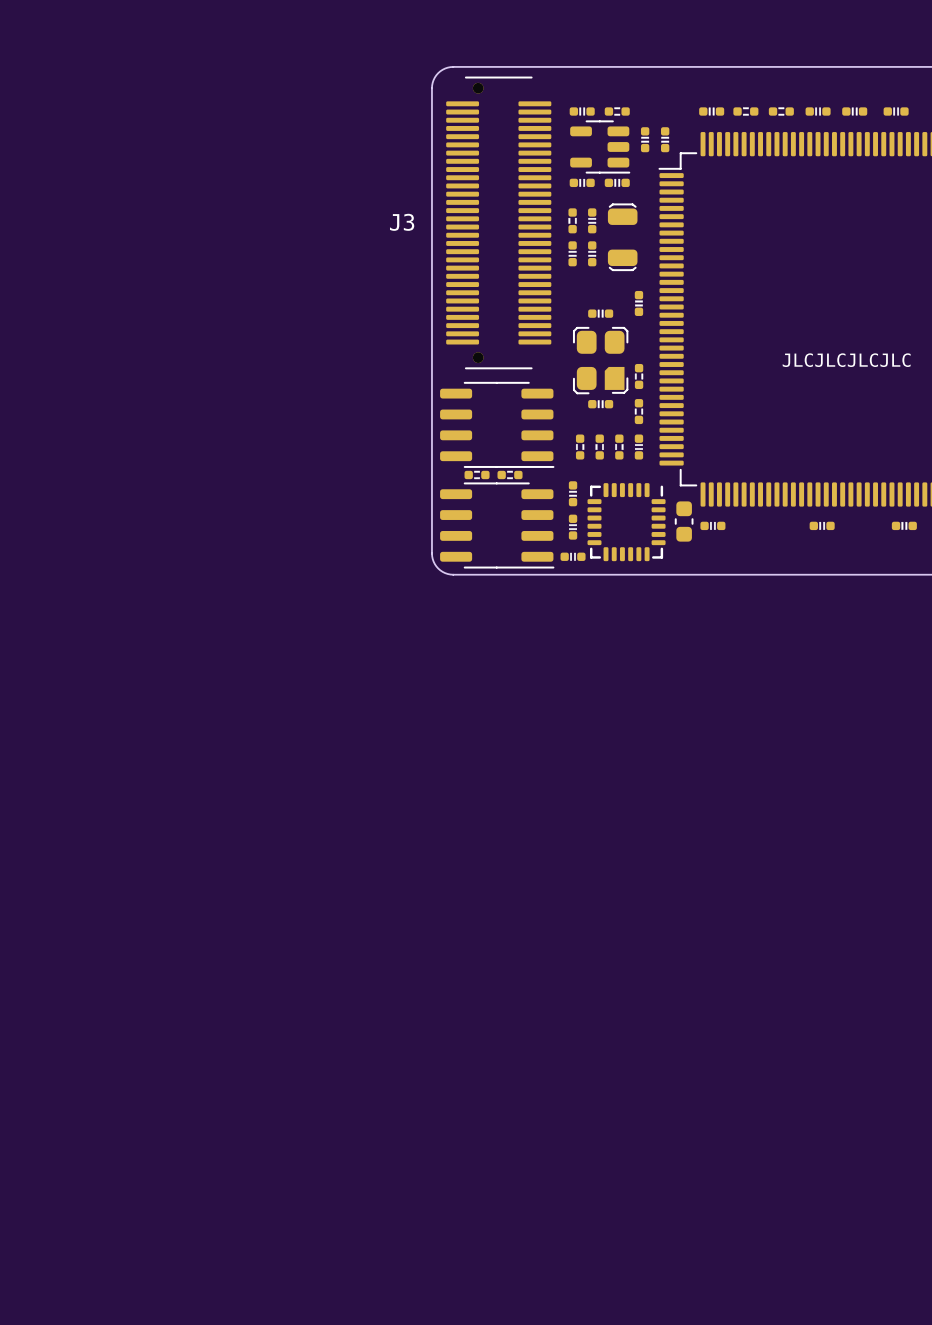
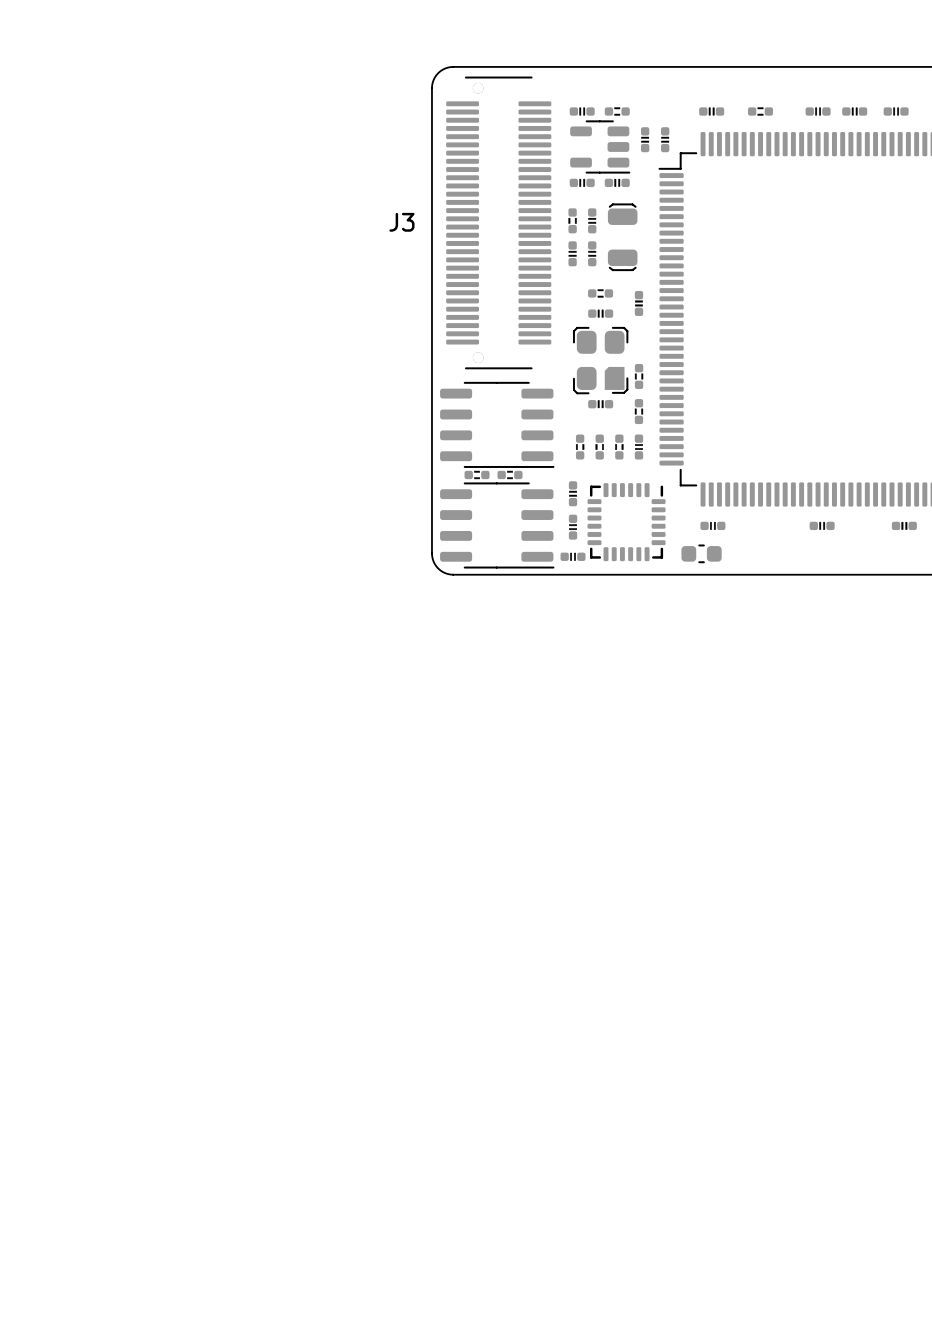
part: (745, 111) -> none
part: none -> (760, 111)
part: (781, 111) -> none
part: none -> (600, 293)
text: JLCJLCJLCJLC (846, 360) -> none
part rotation: 0° (684, 521) -> 90° clockwise (701, 553)
part position: (684, 521) -> (701, 553)

